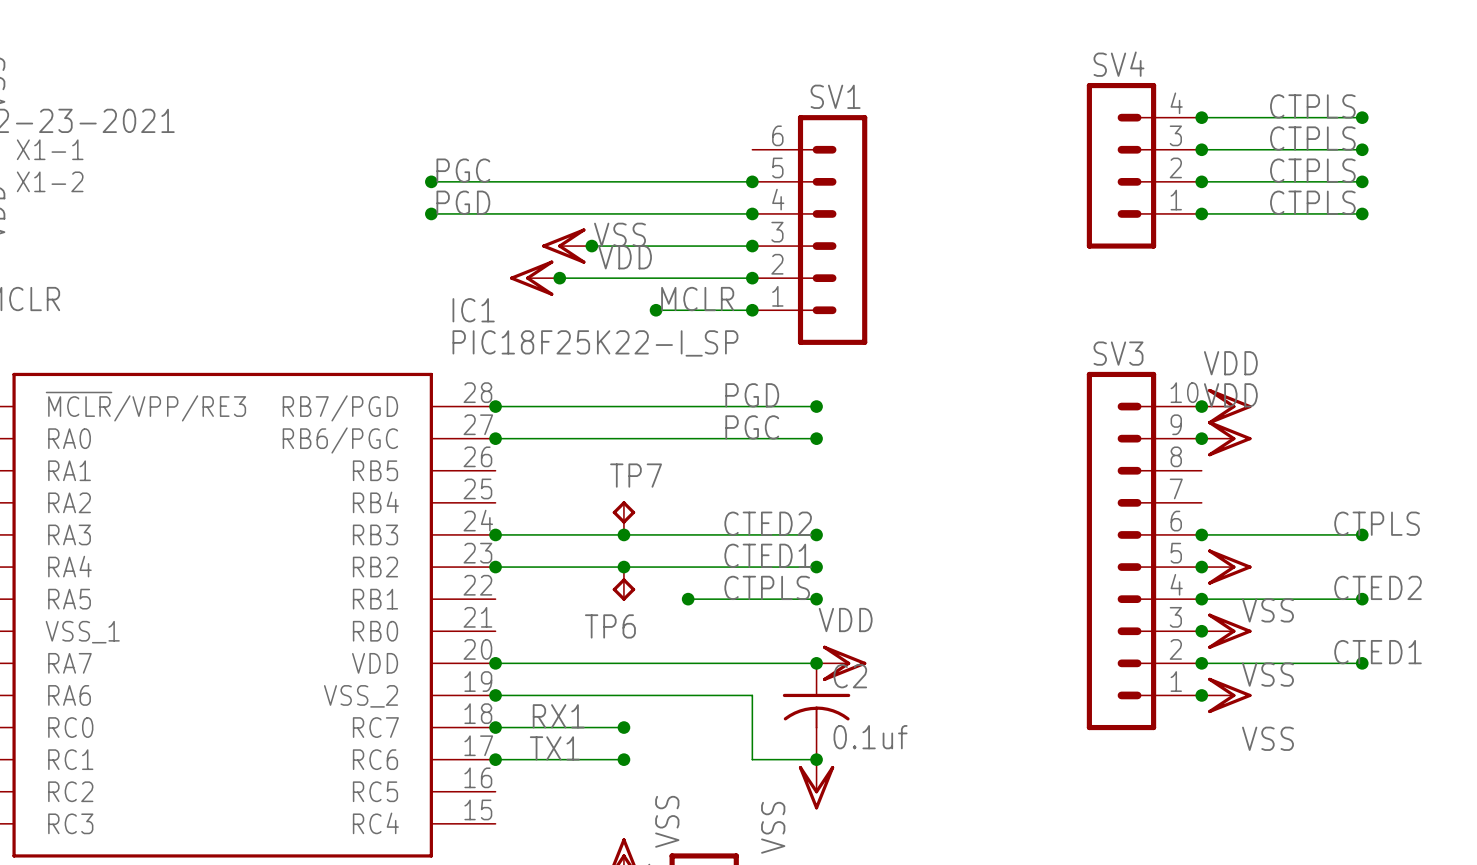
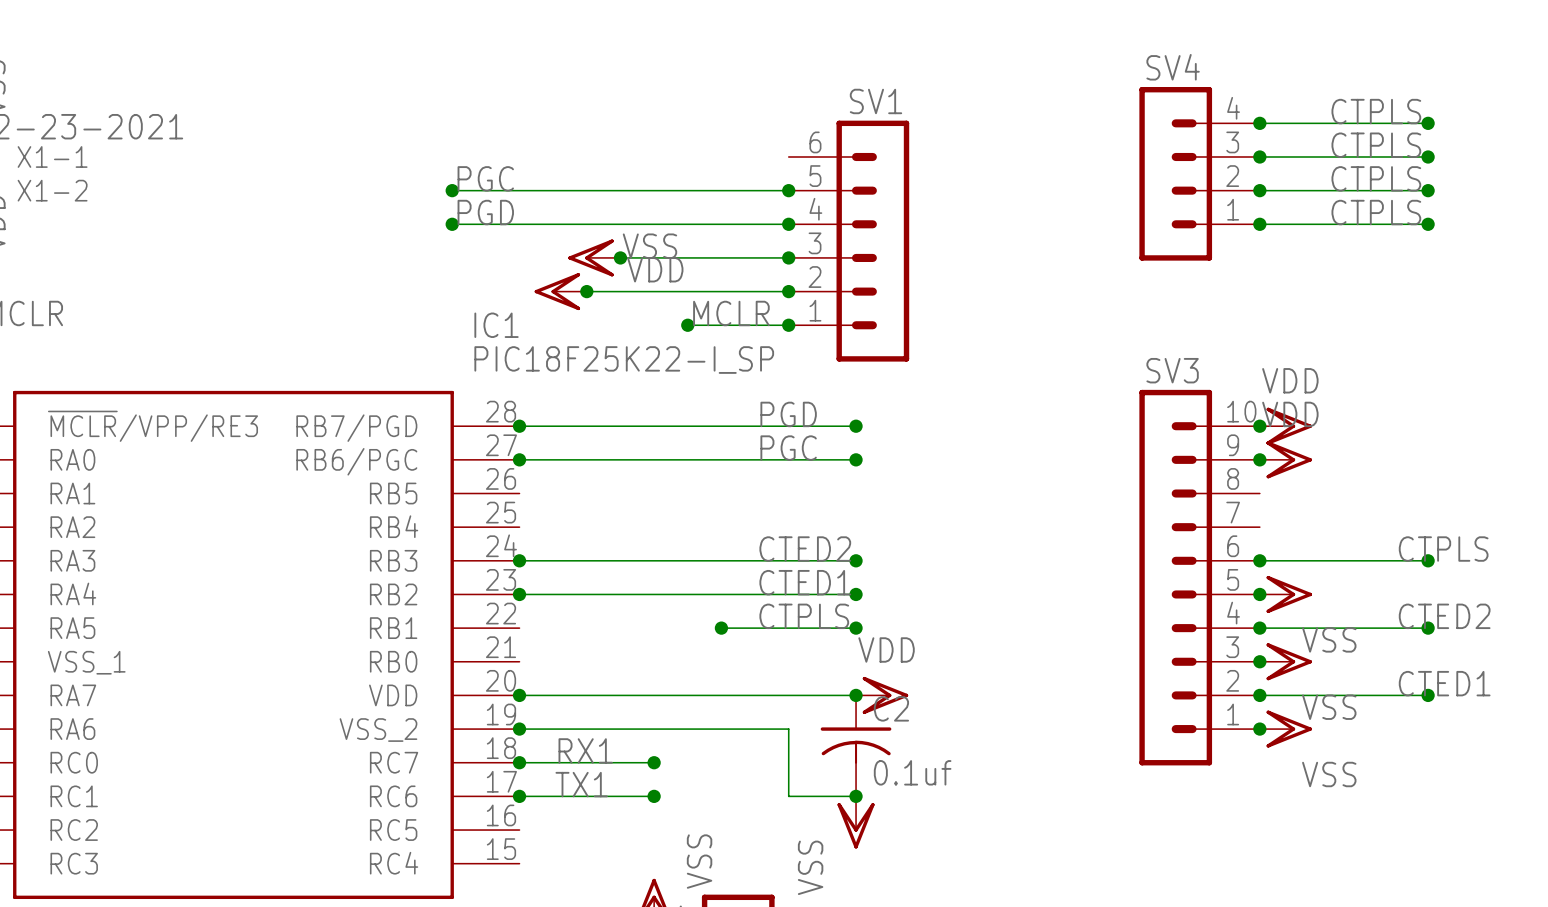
TP7: (623, 518) -> none
junction: (623, 534) -> none
junction: (623, 567) -> none
TP6: (623, 583) -> none

